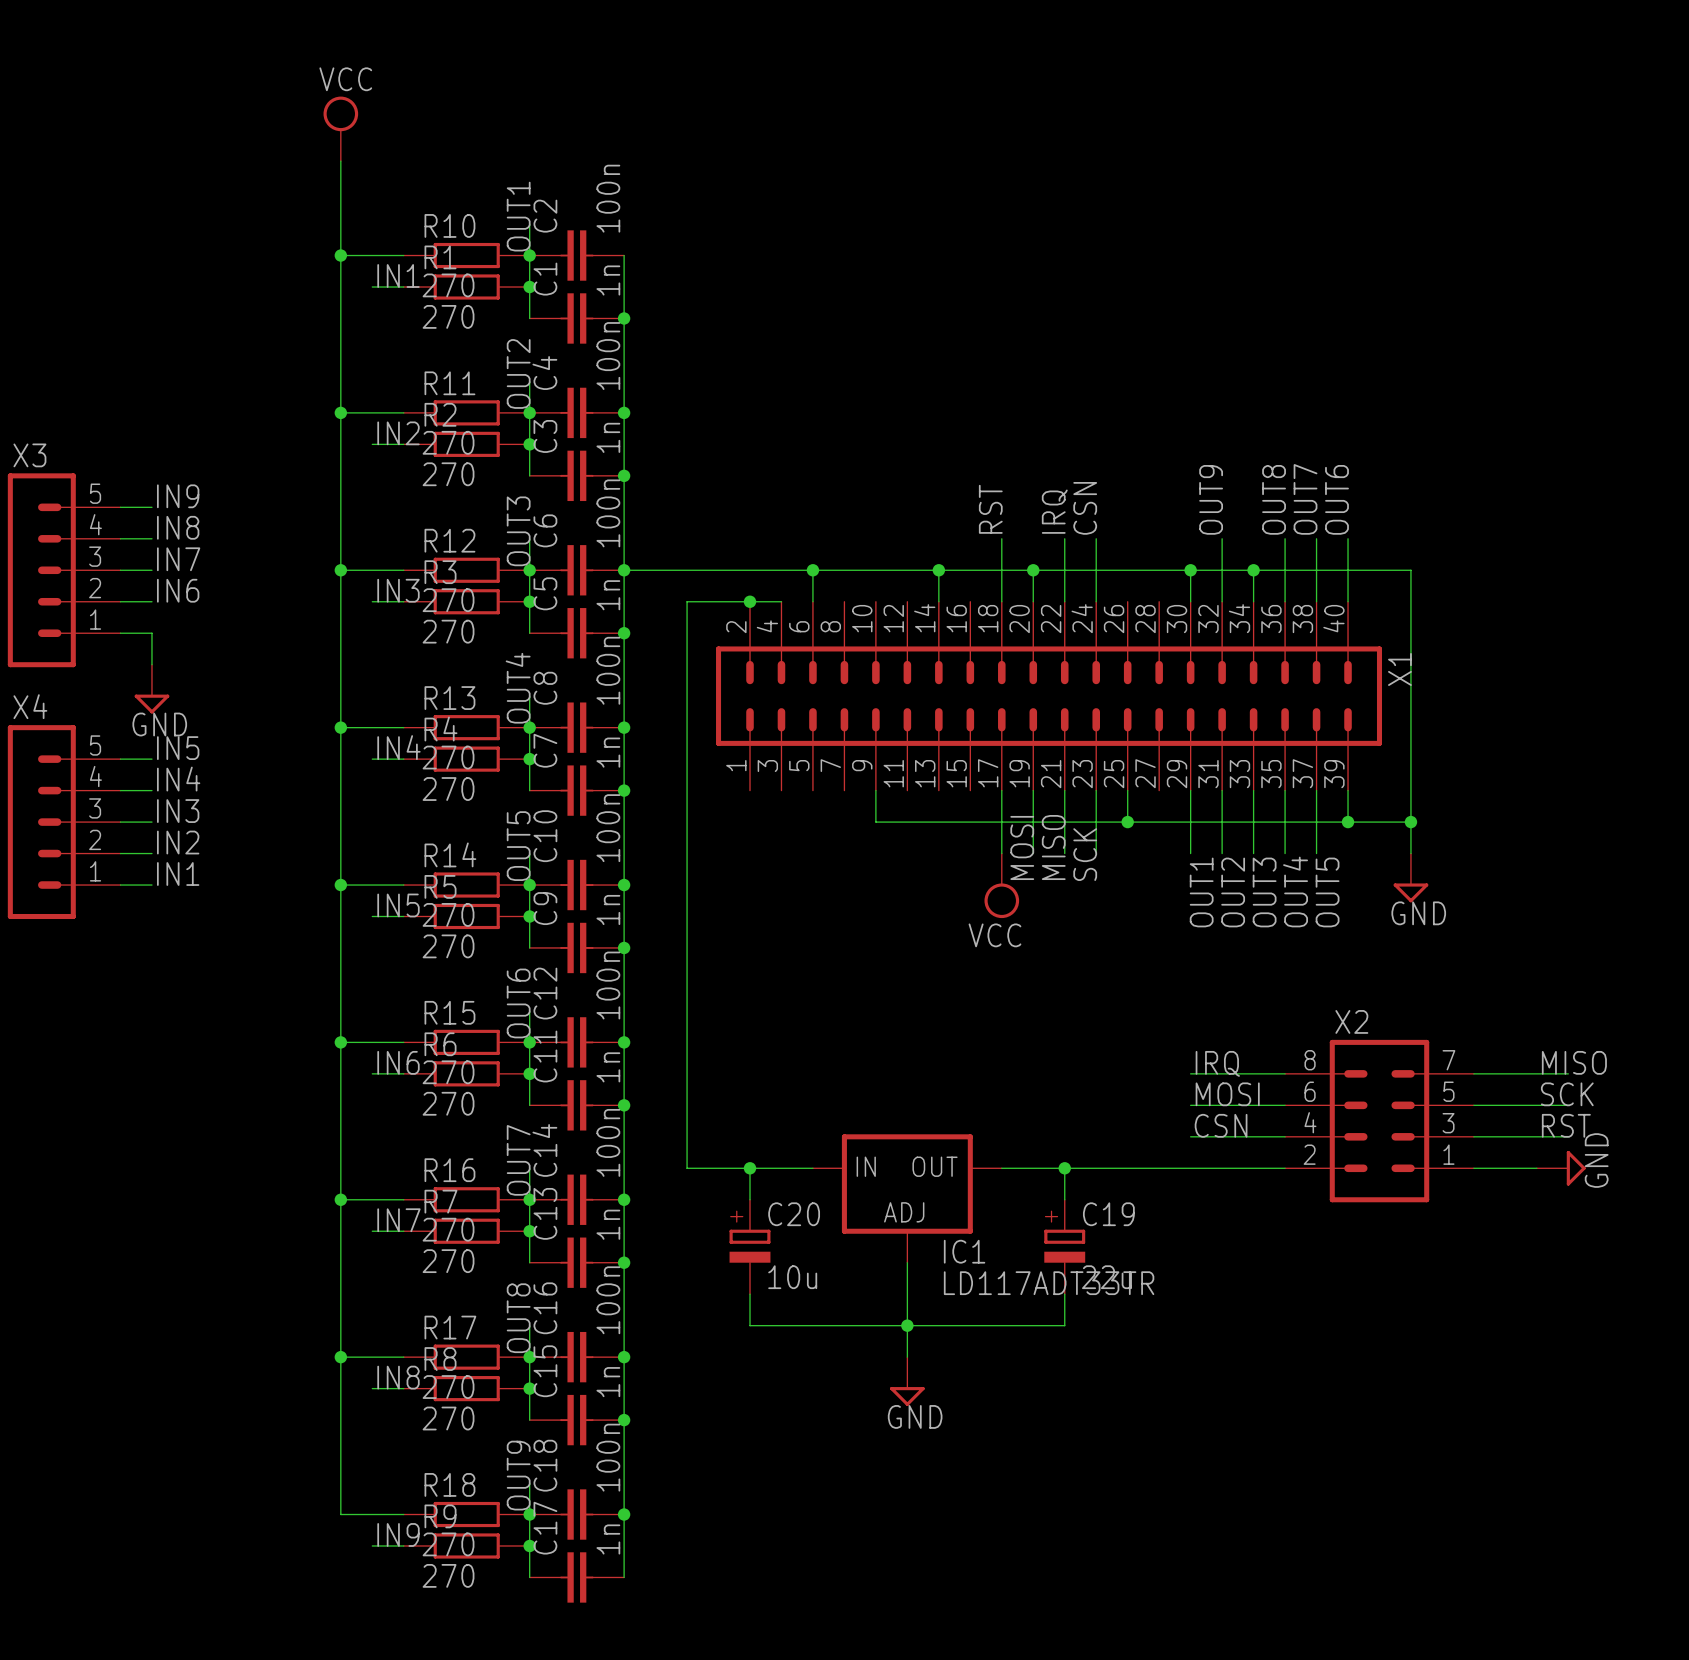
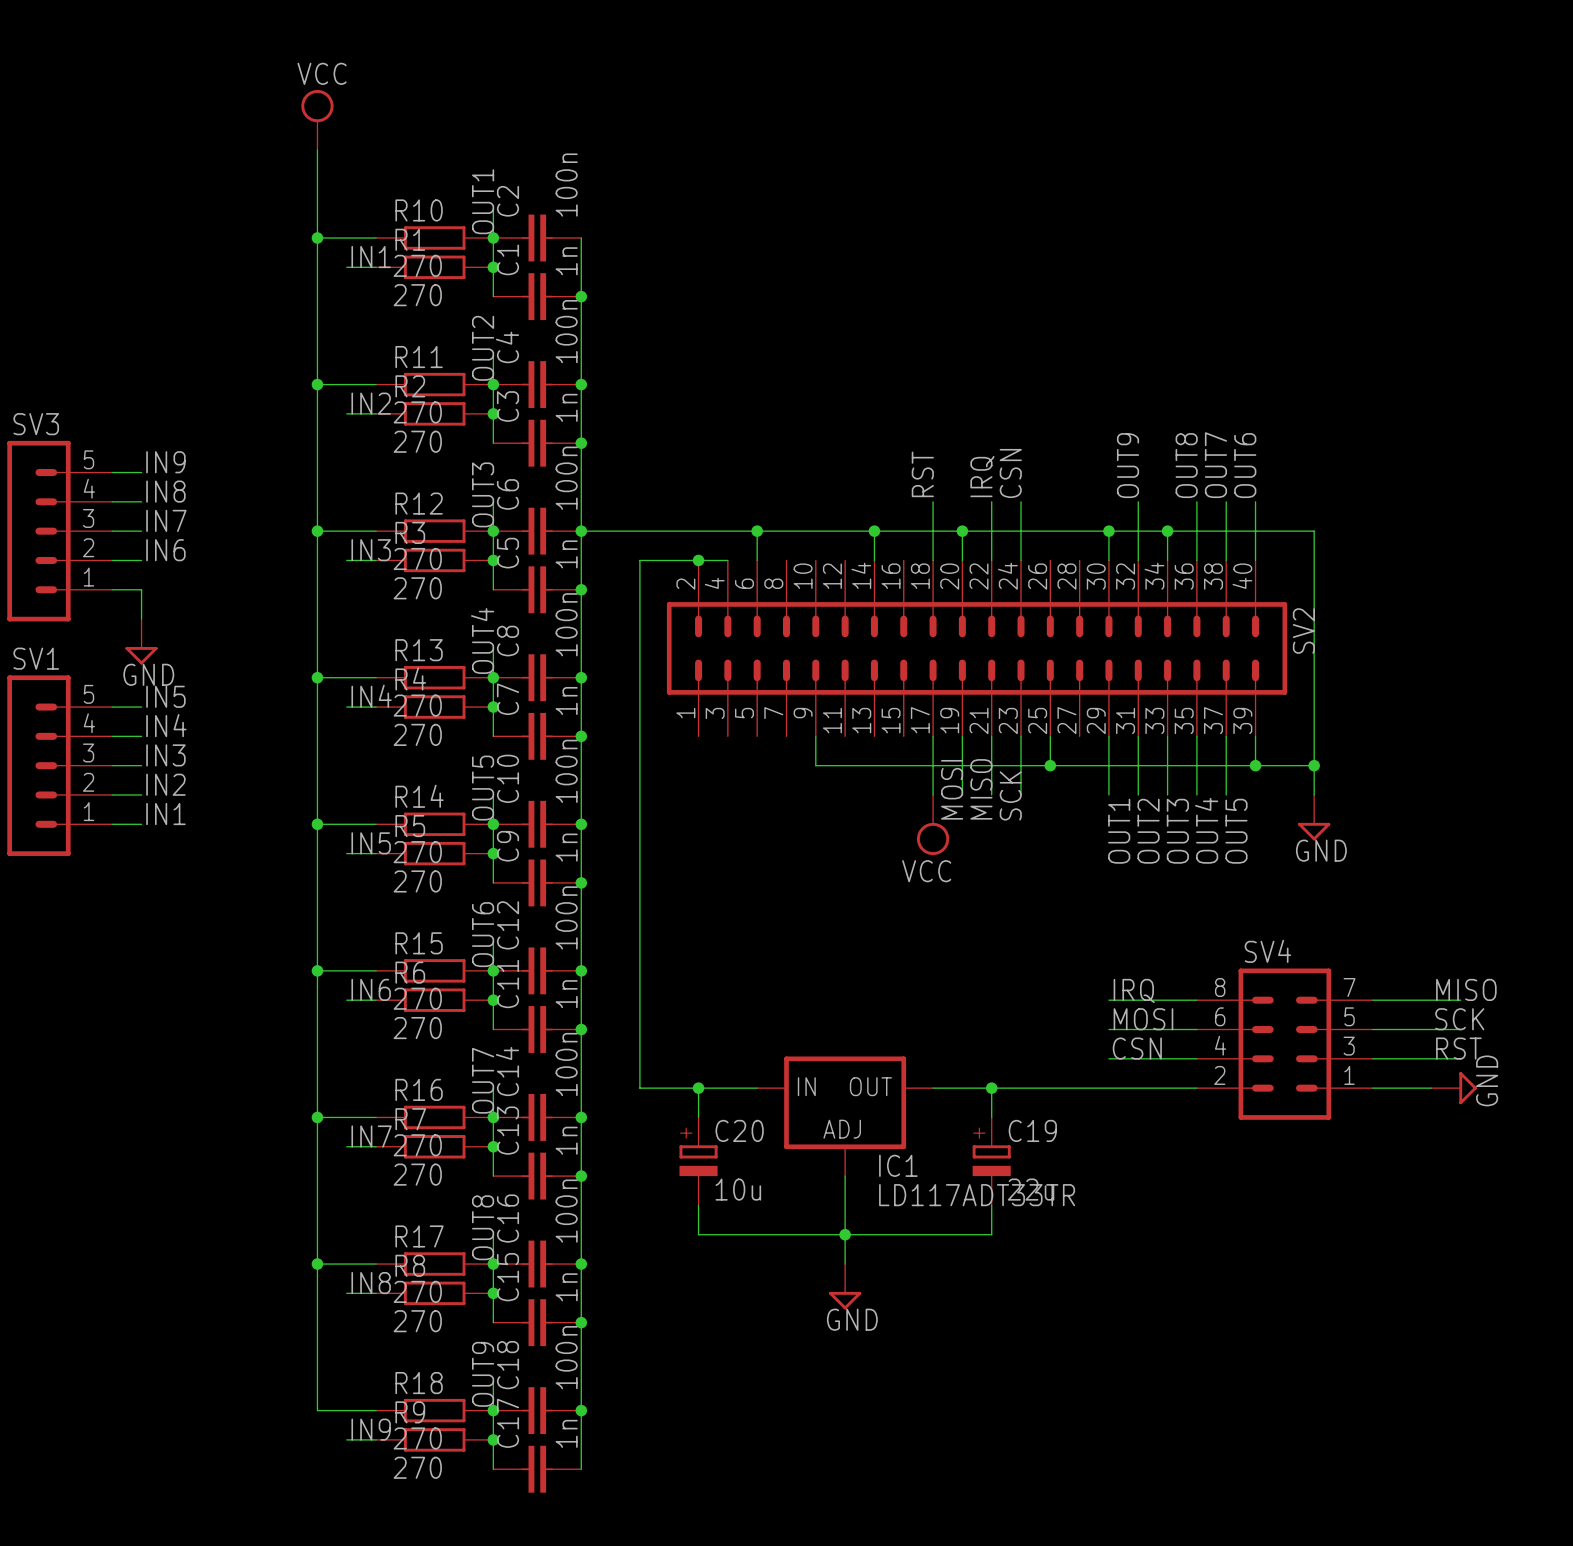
X3 name: X3 (29, 455) -> SV3 (36, 424)
X1 name: X1 (1399, 669) -> SV2 (1303, 631)
X4 name: X4 (30, 706) -> SV1 (36, 658)
X2 name: X2 (1351, 1021) -> SV4 (1267, 951)

